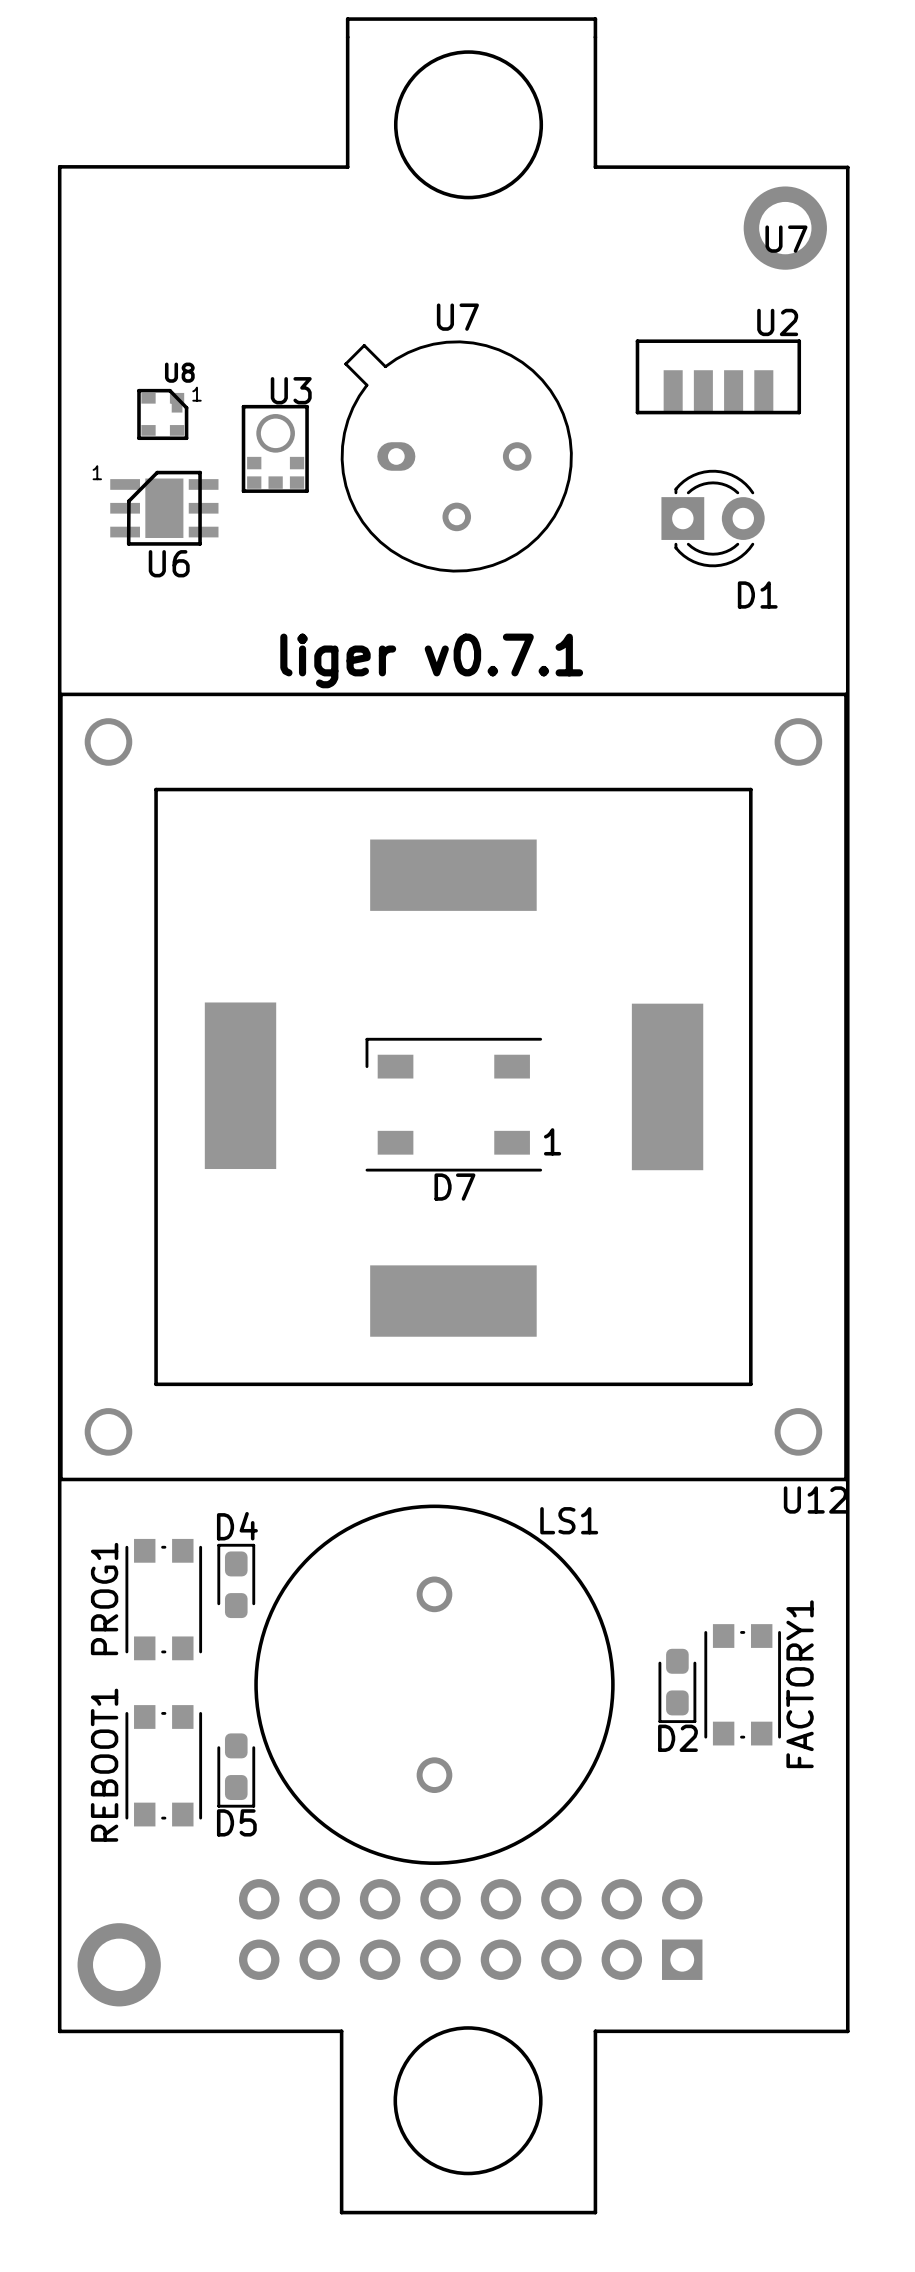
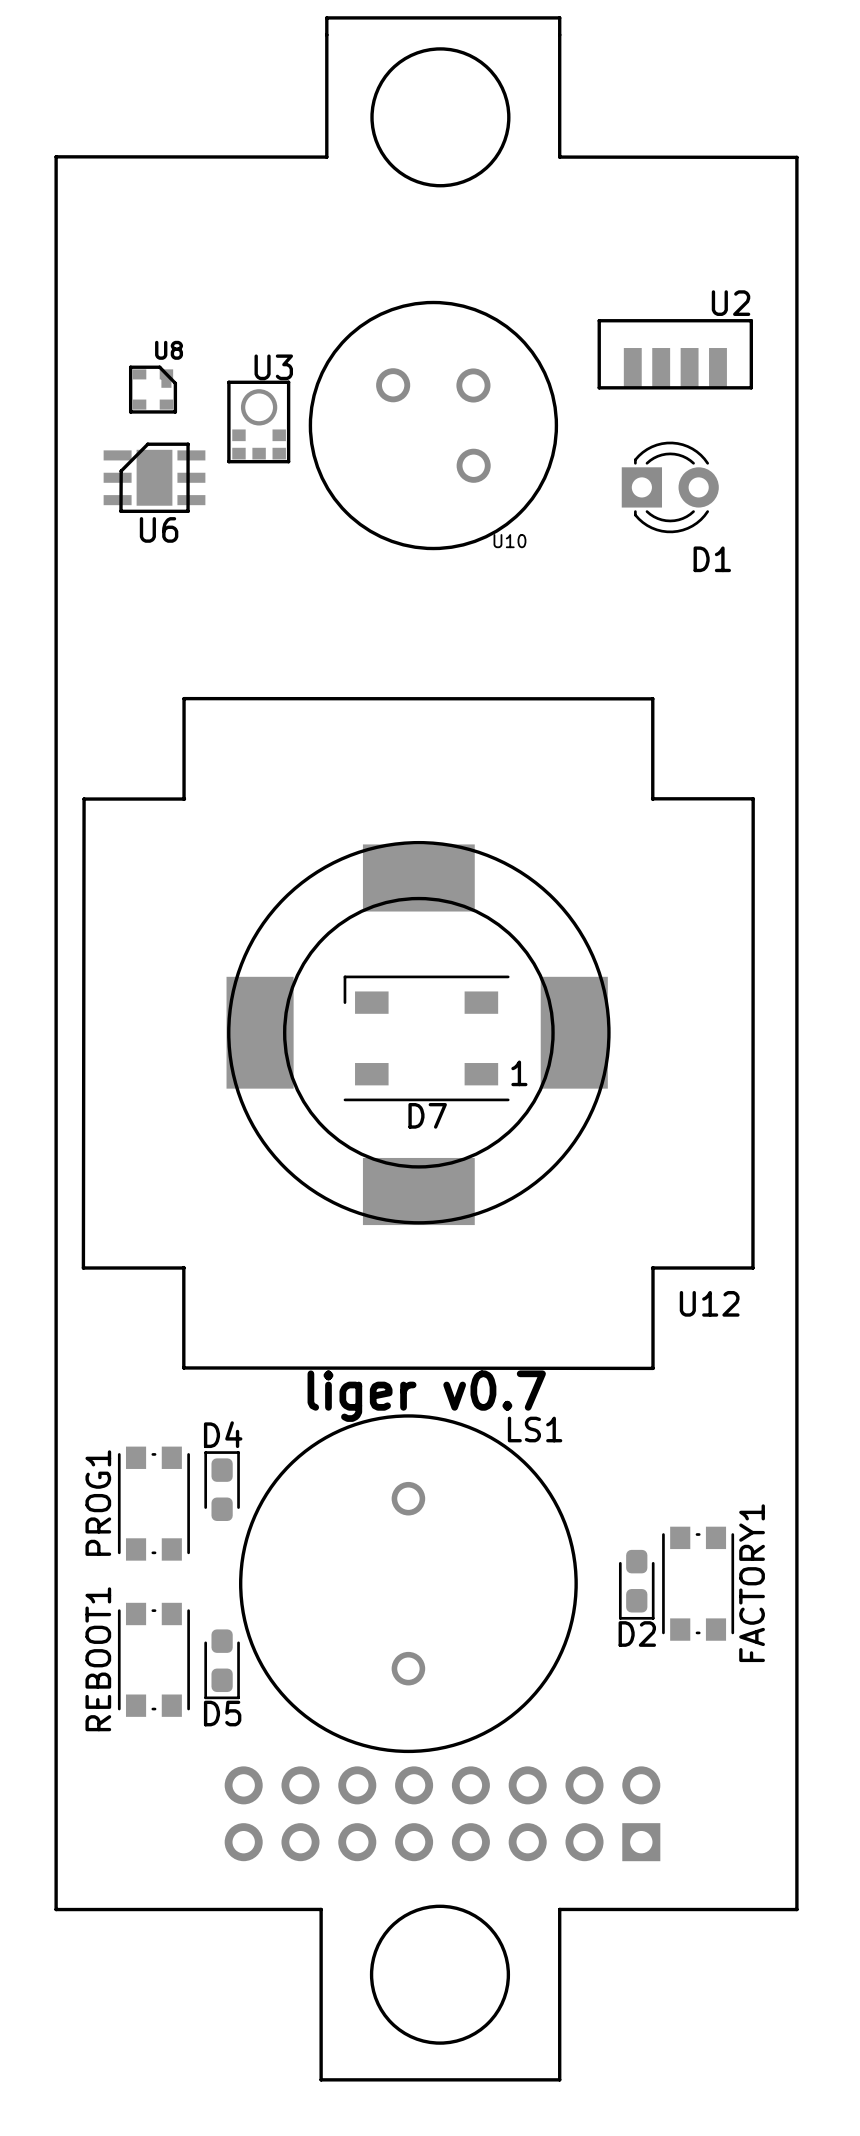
text: 1 (197, 394) -> none
U10: none -> (433, 425)
U7: (456, 456) -> none
text: 1 (97, 472) -> none
text: liger v0.7.1 (431, 660) -> none
U12 footprint: [59, 692, 848, 1482] -> [81, 696, 755, 1371]
U7: (452, 1096) -> none
text: none -> liger v0.7 (426, 1396)
U12 name position: U12 (815, 1500) -> U12 (709, 1303)

